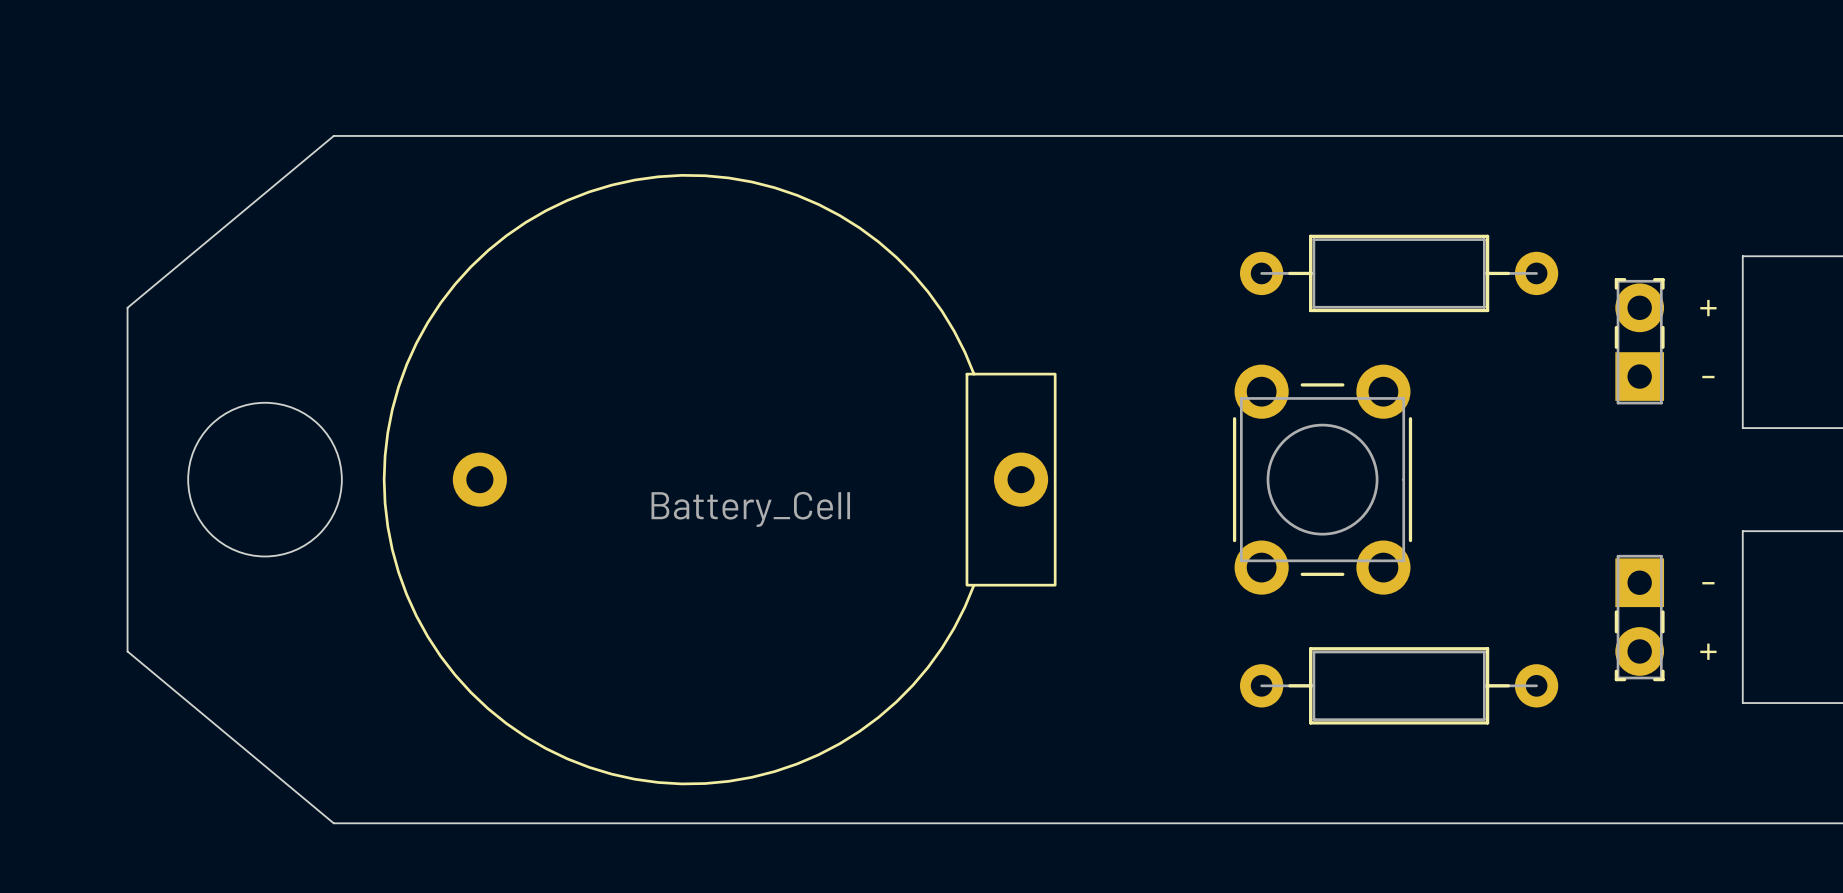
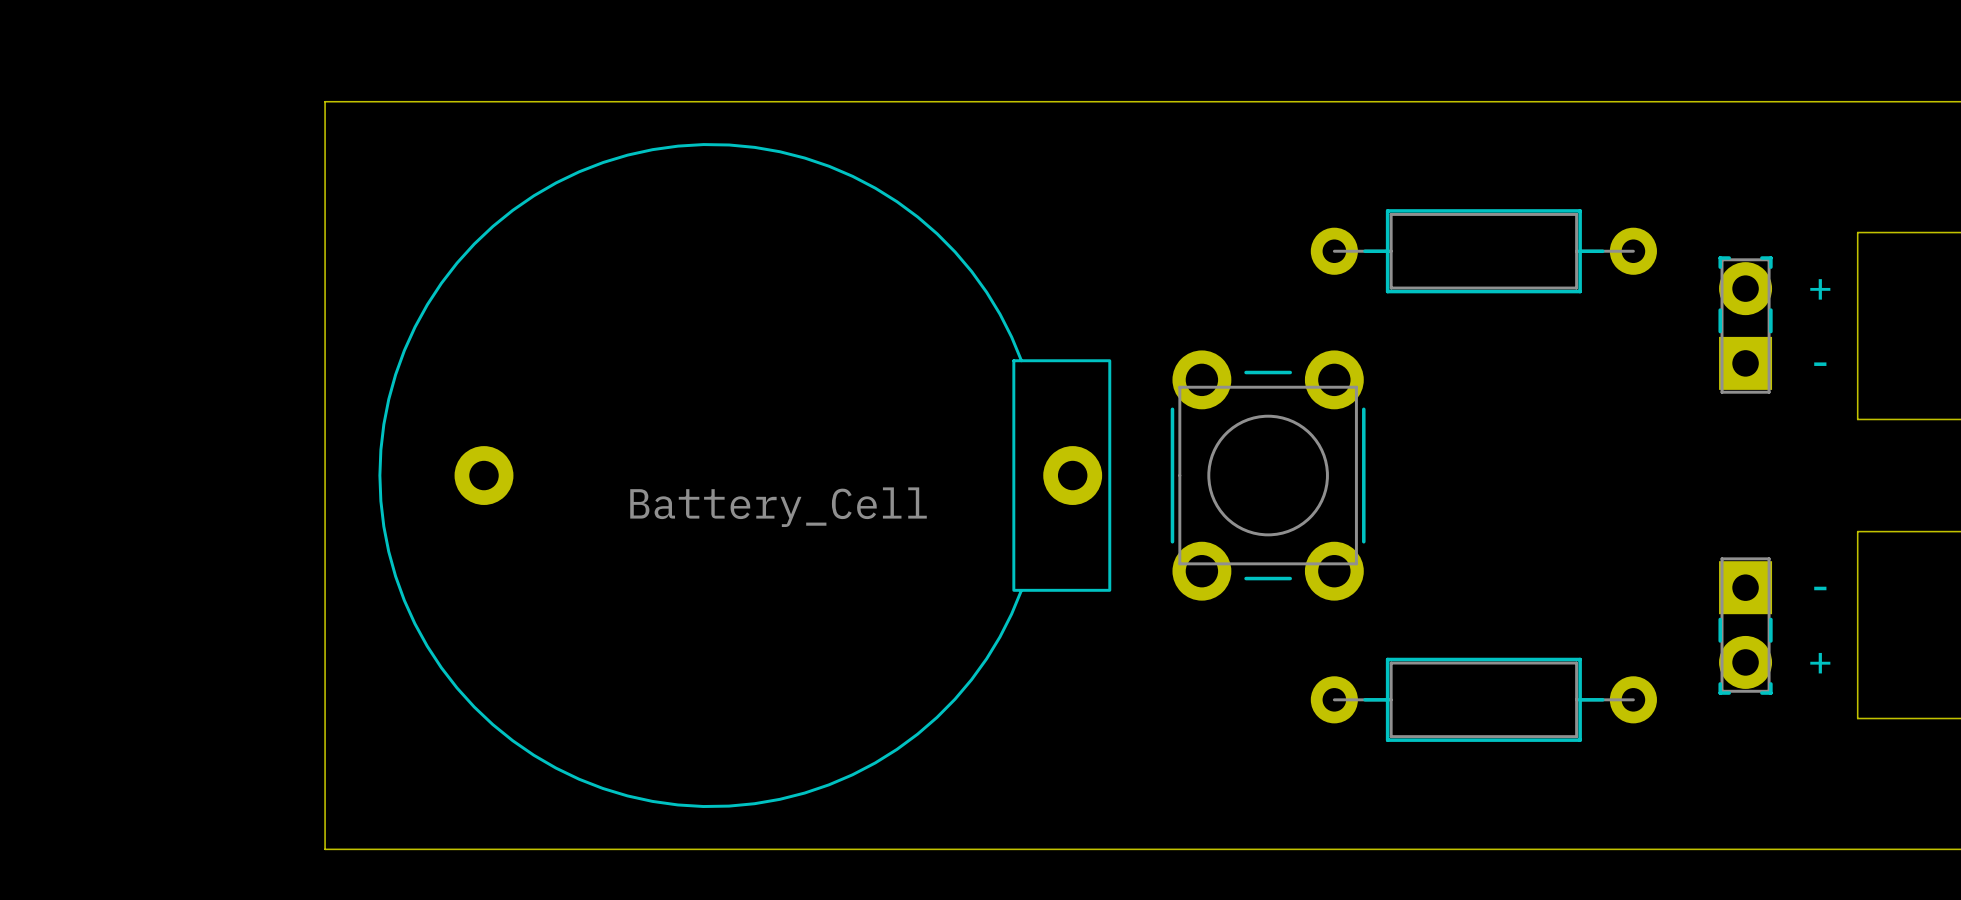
board edge: (333, 135) (127, 307) (127, 651) (333, 823) -> (325, 101) (325, 849)
round board edge: [187, 402, 343, 558] -> none
part rotation: 0° (1322, 479) -> 180° (1268, 475)

